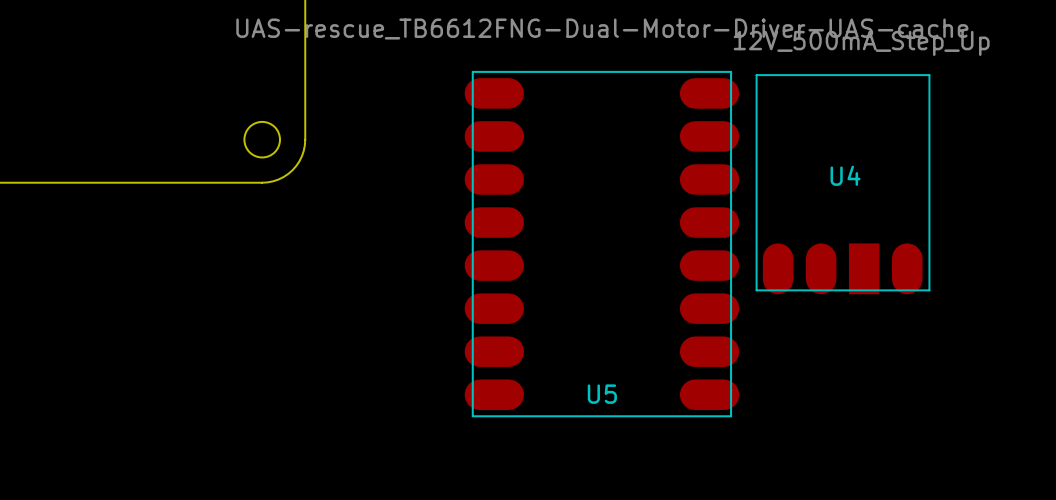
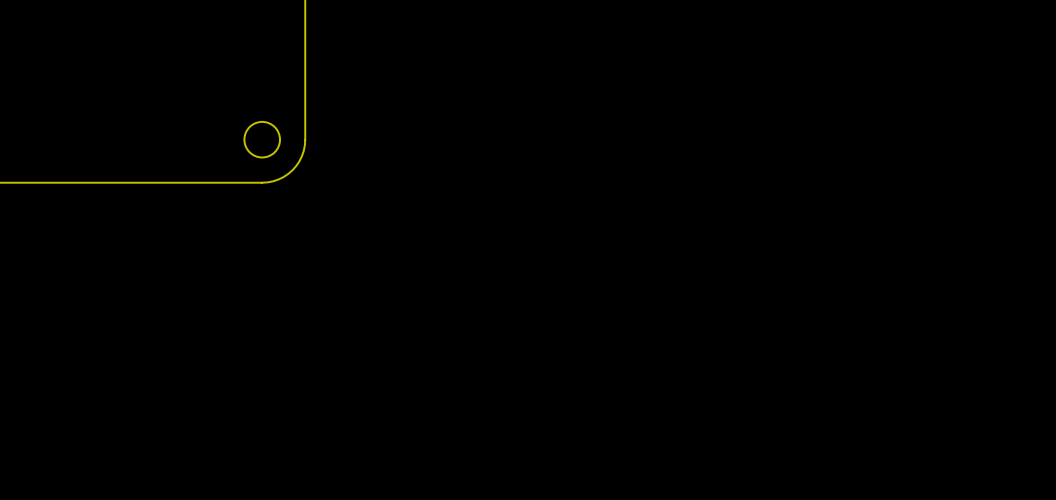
U4: 12V_500mA_Step_Up (843, 184) -> none
U5: UAS-rescue_TB6612FNG-Dual-Motor-Driver-UAS-cache (601, 244) -> none

